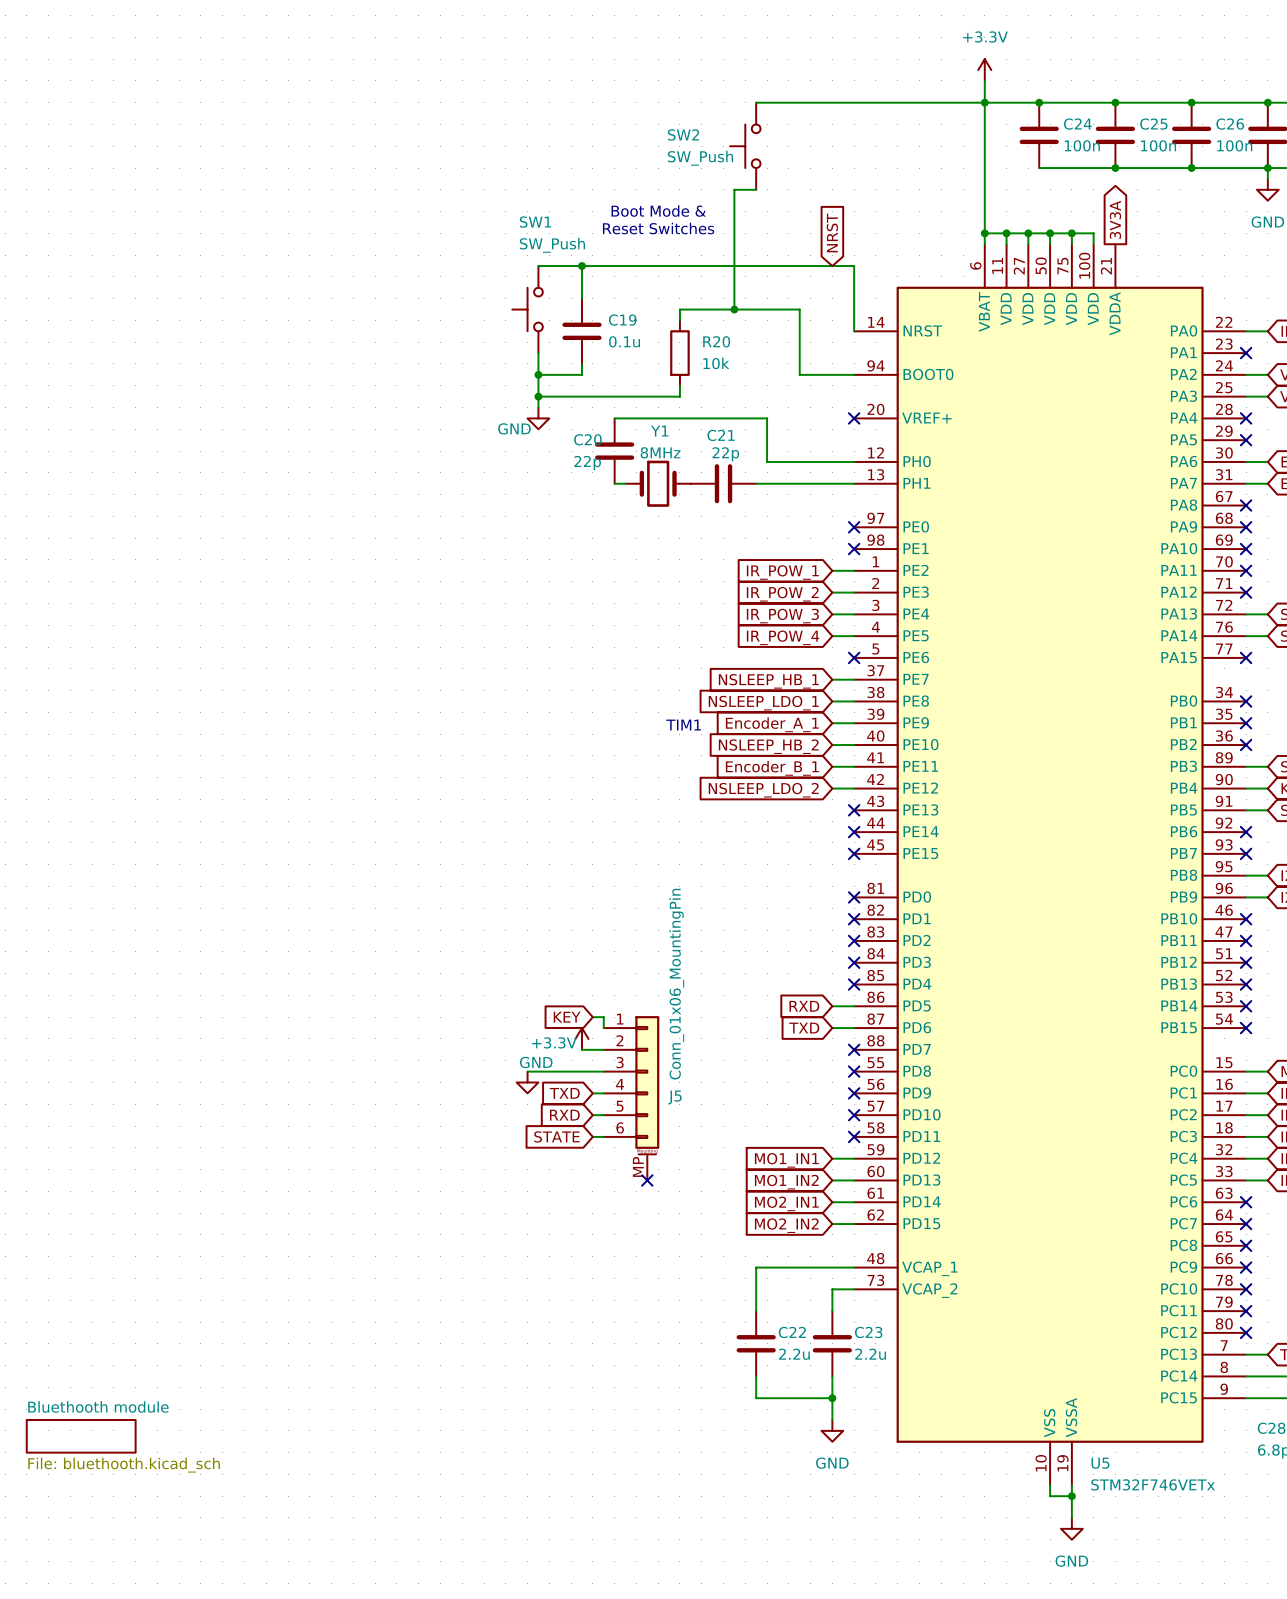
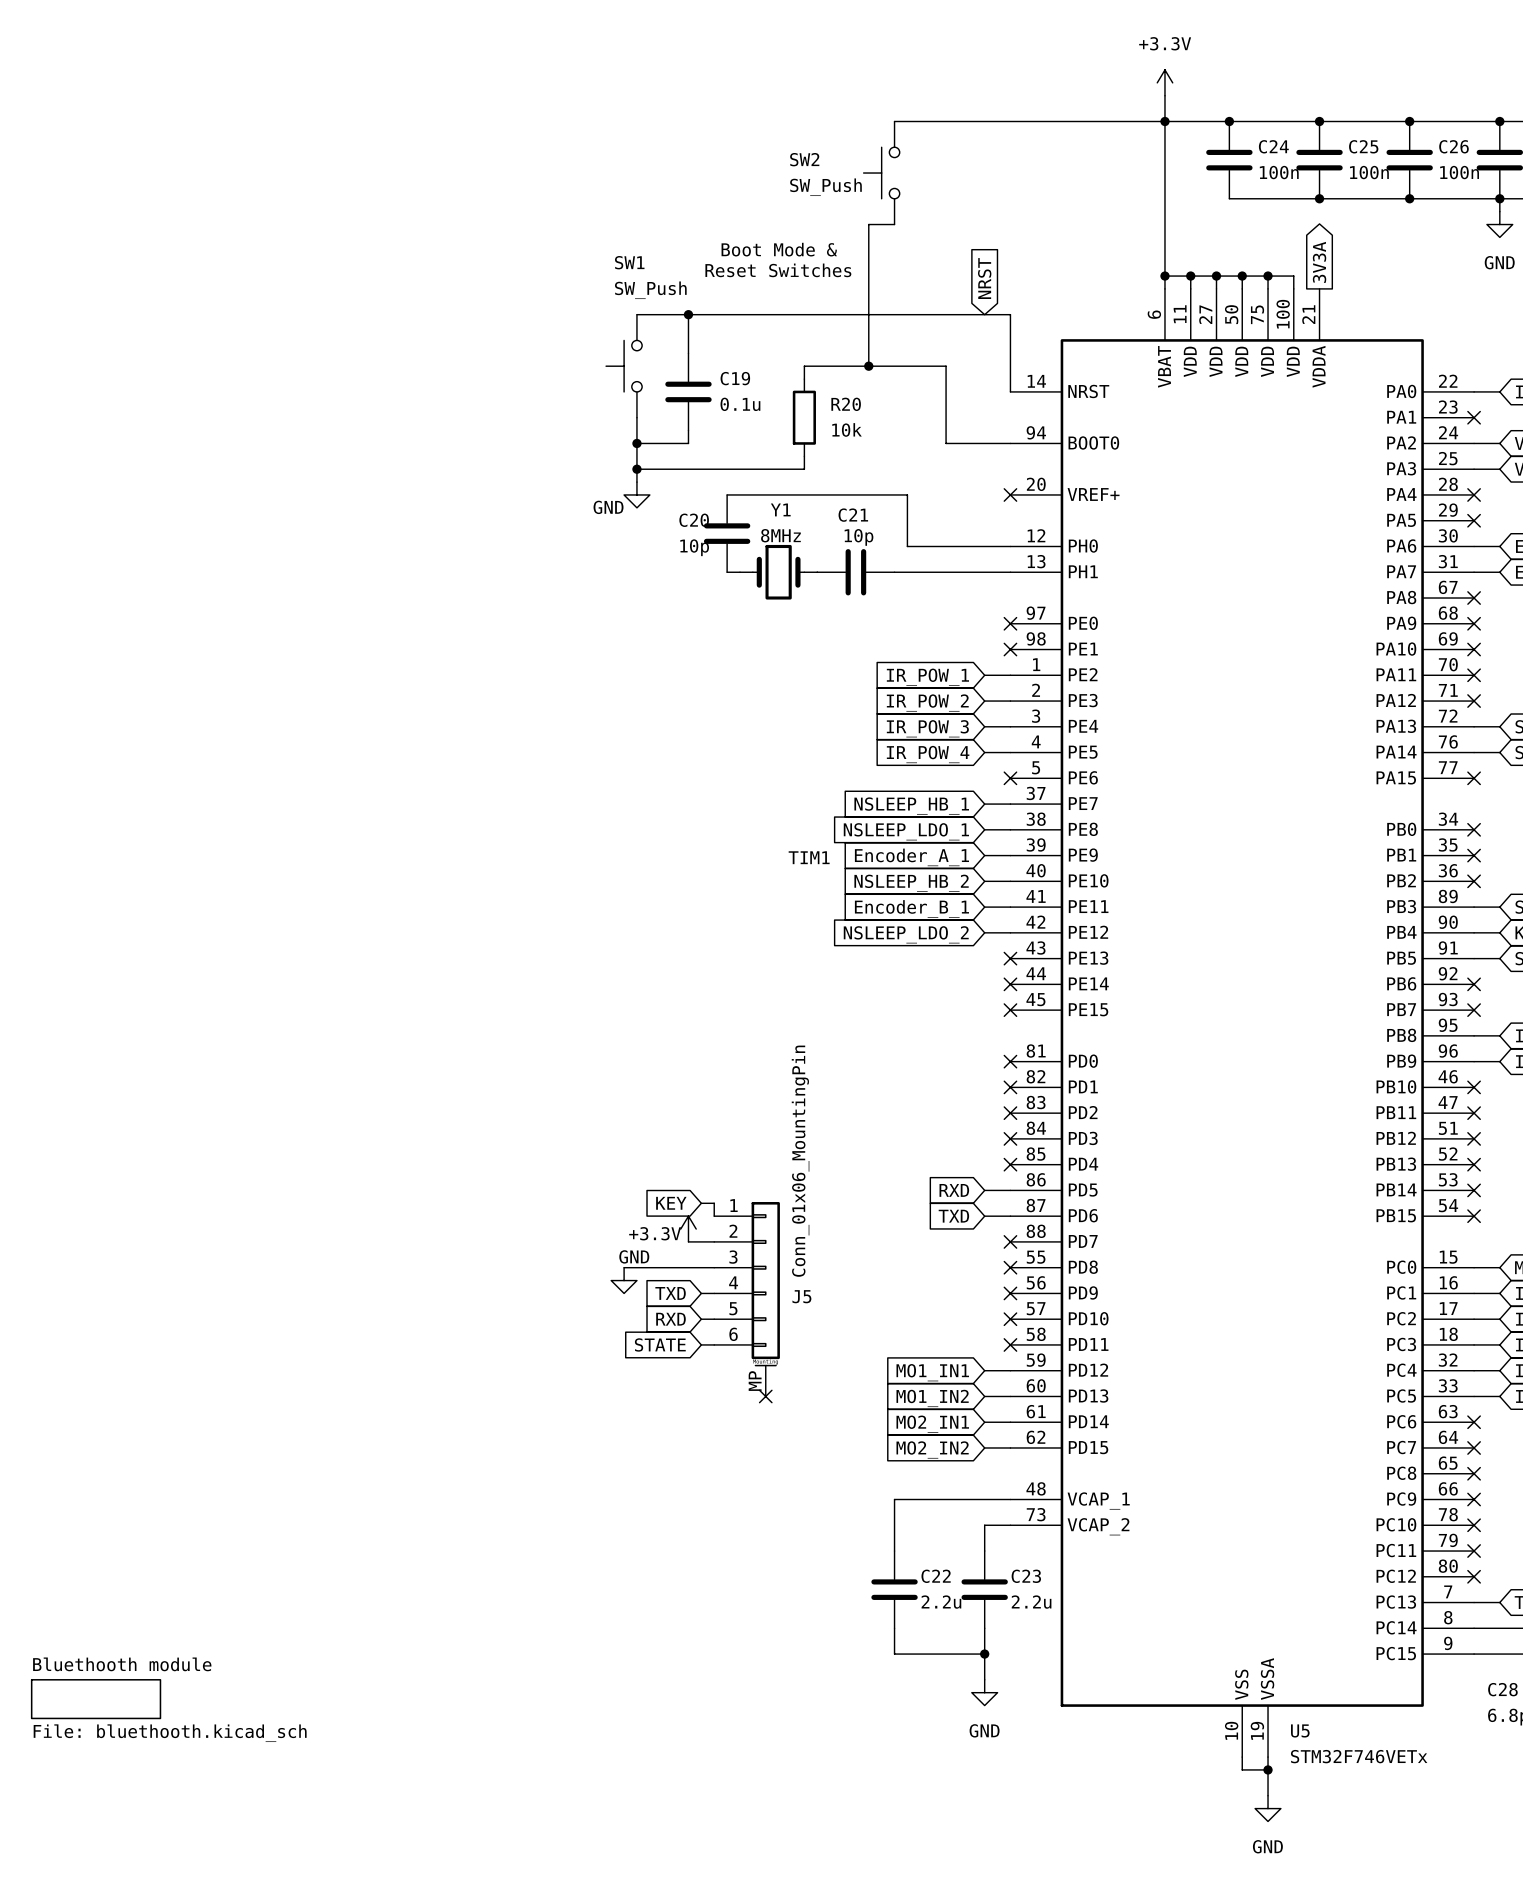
C21 value: 22p (725, 454) -> 10p (859, 537)
C20 value: 22p (587, 463) -> 10p (694, 547)

